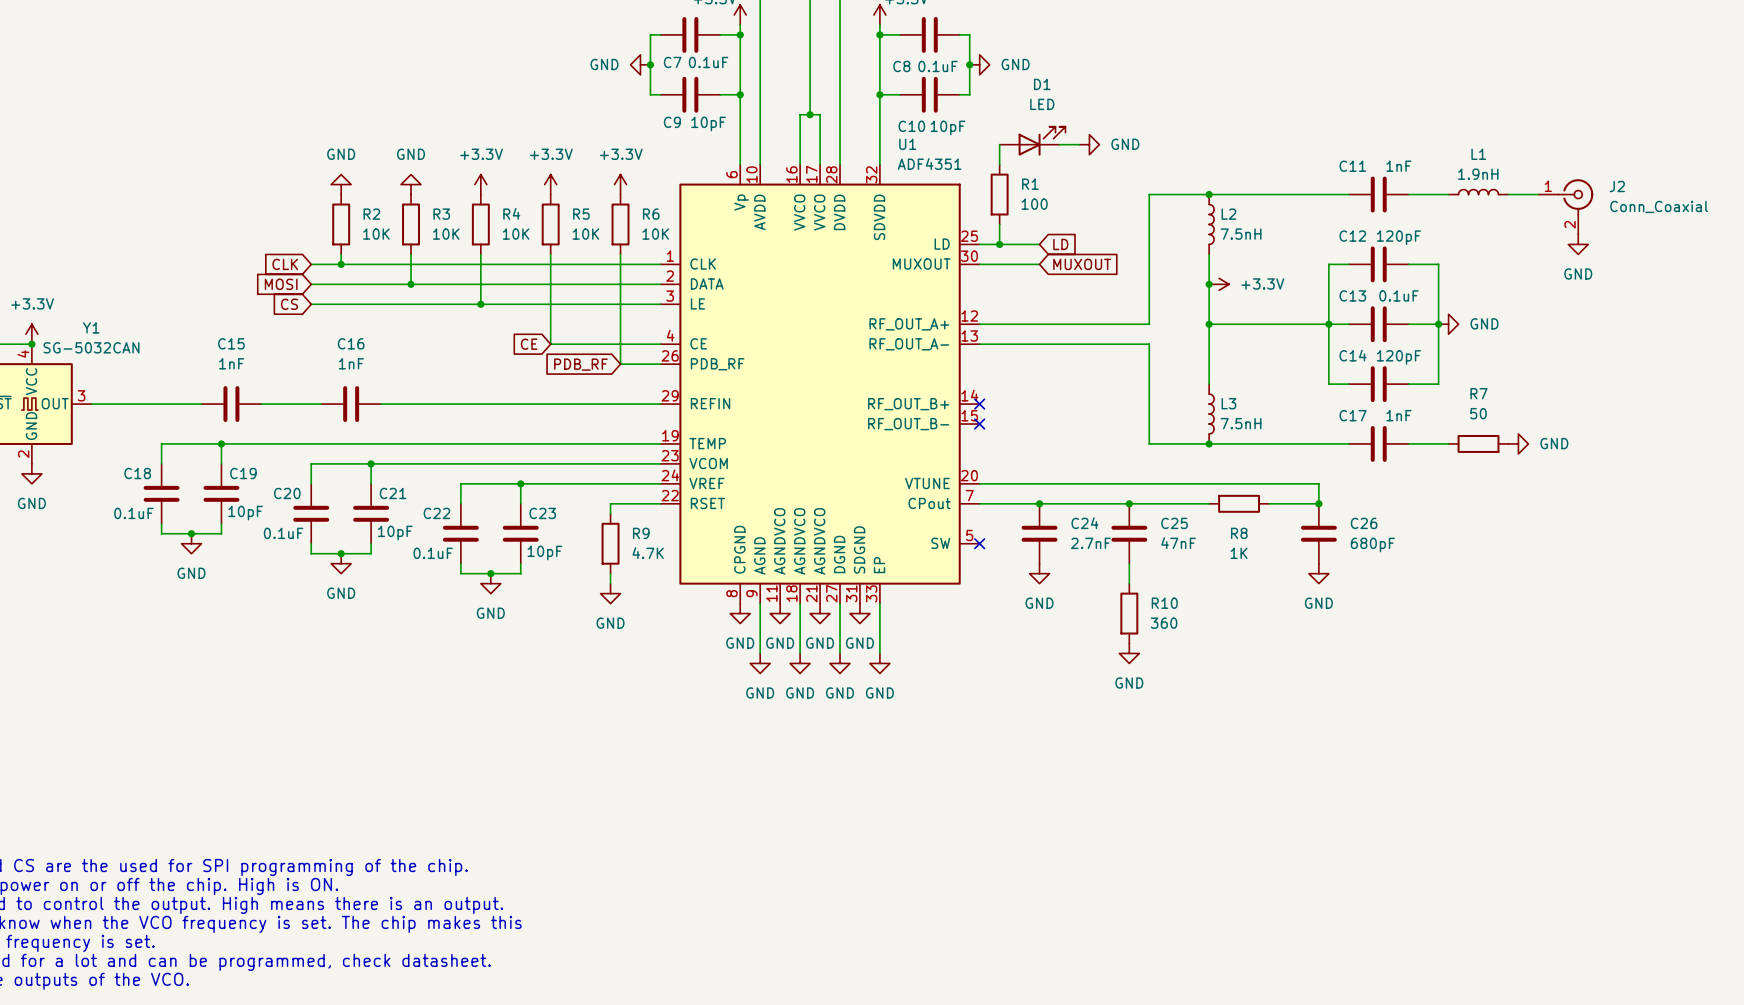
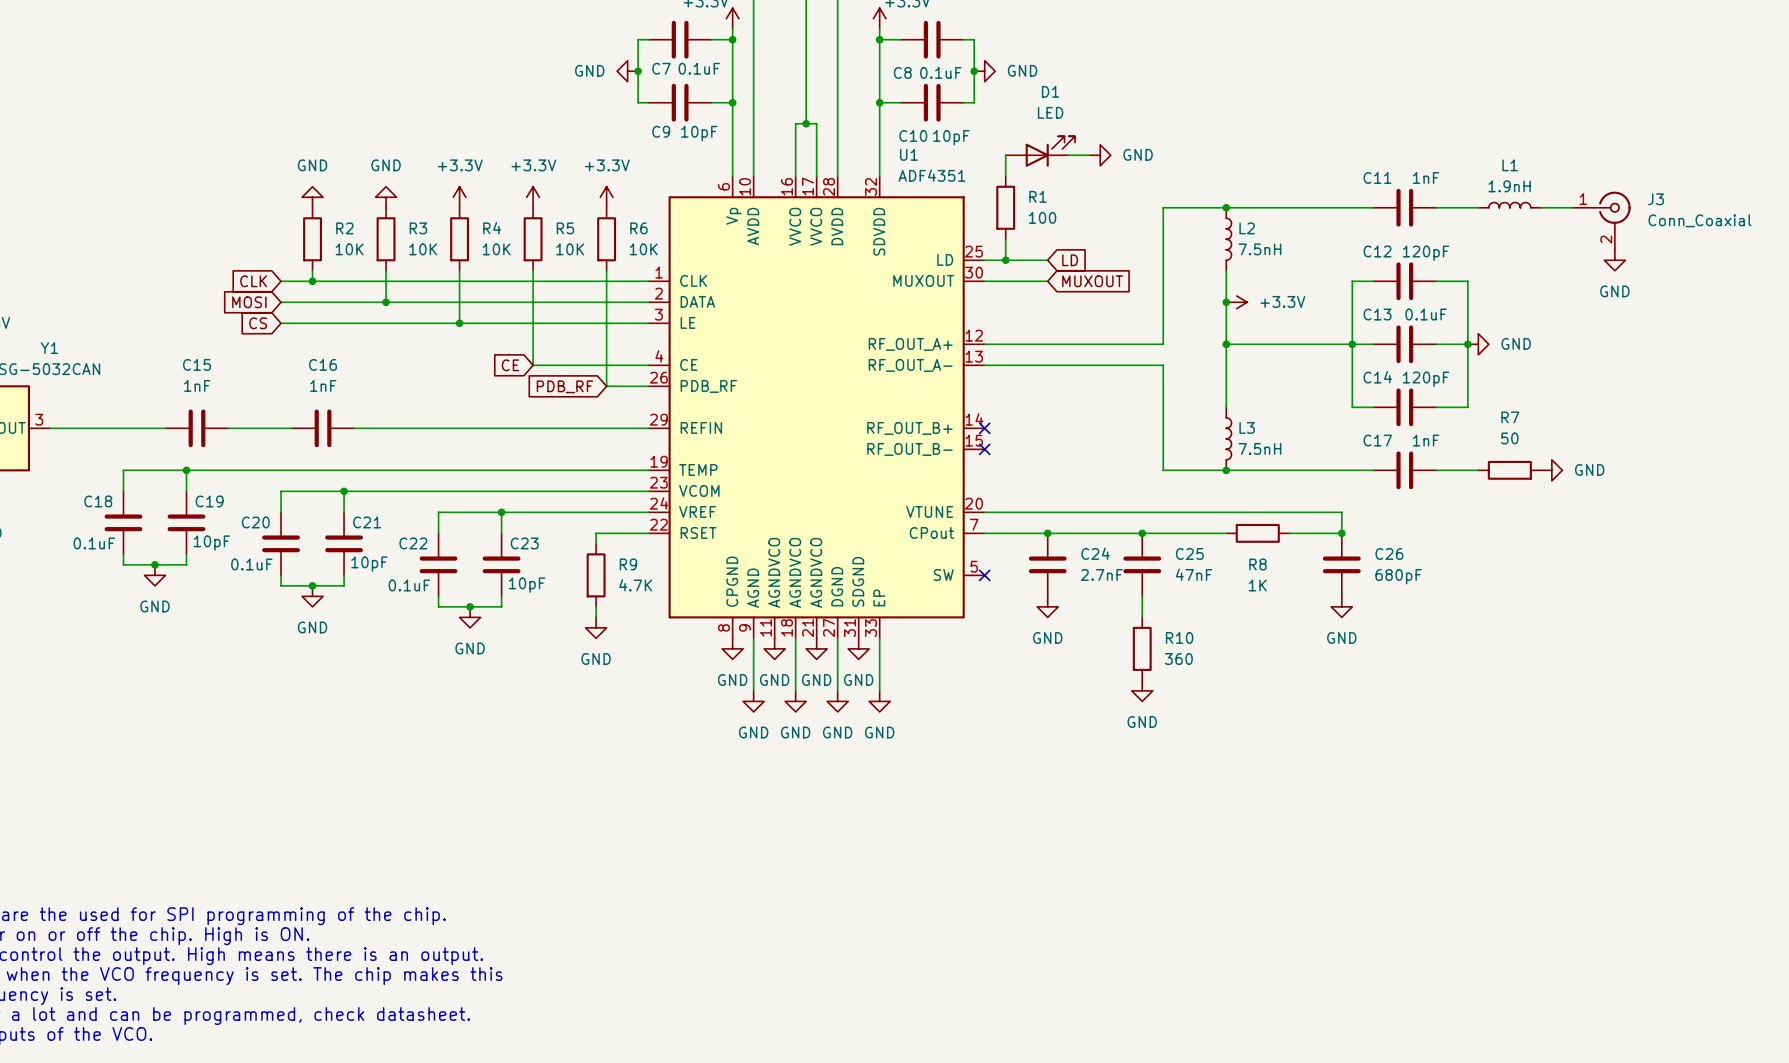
J2 name: J2 (1617, 186) -> J3 (1655, 199)

